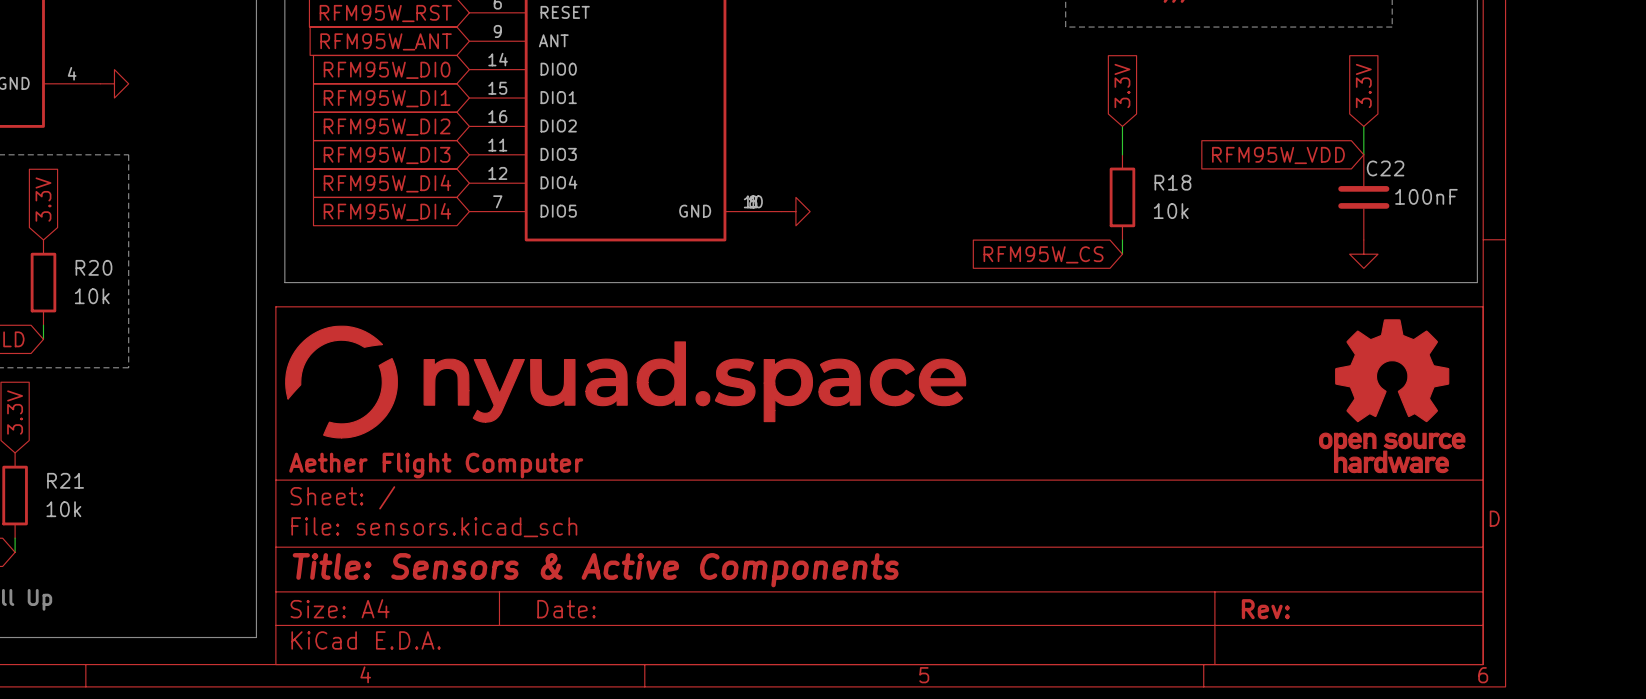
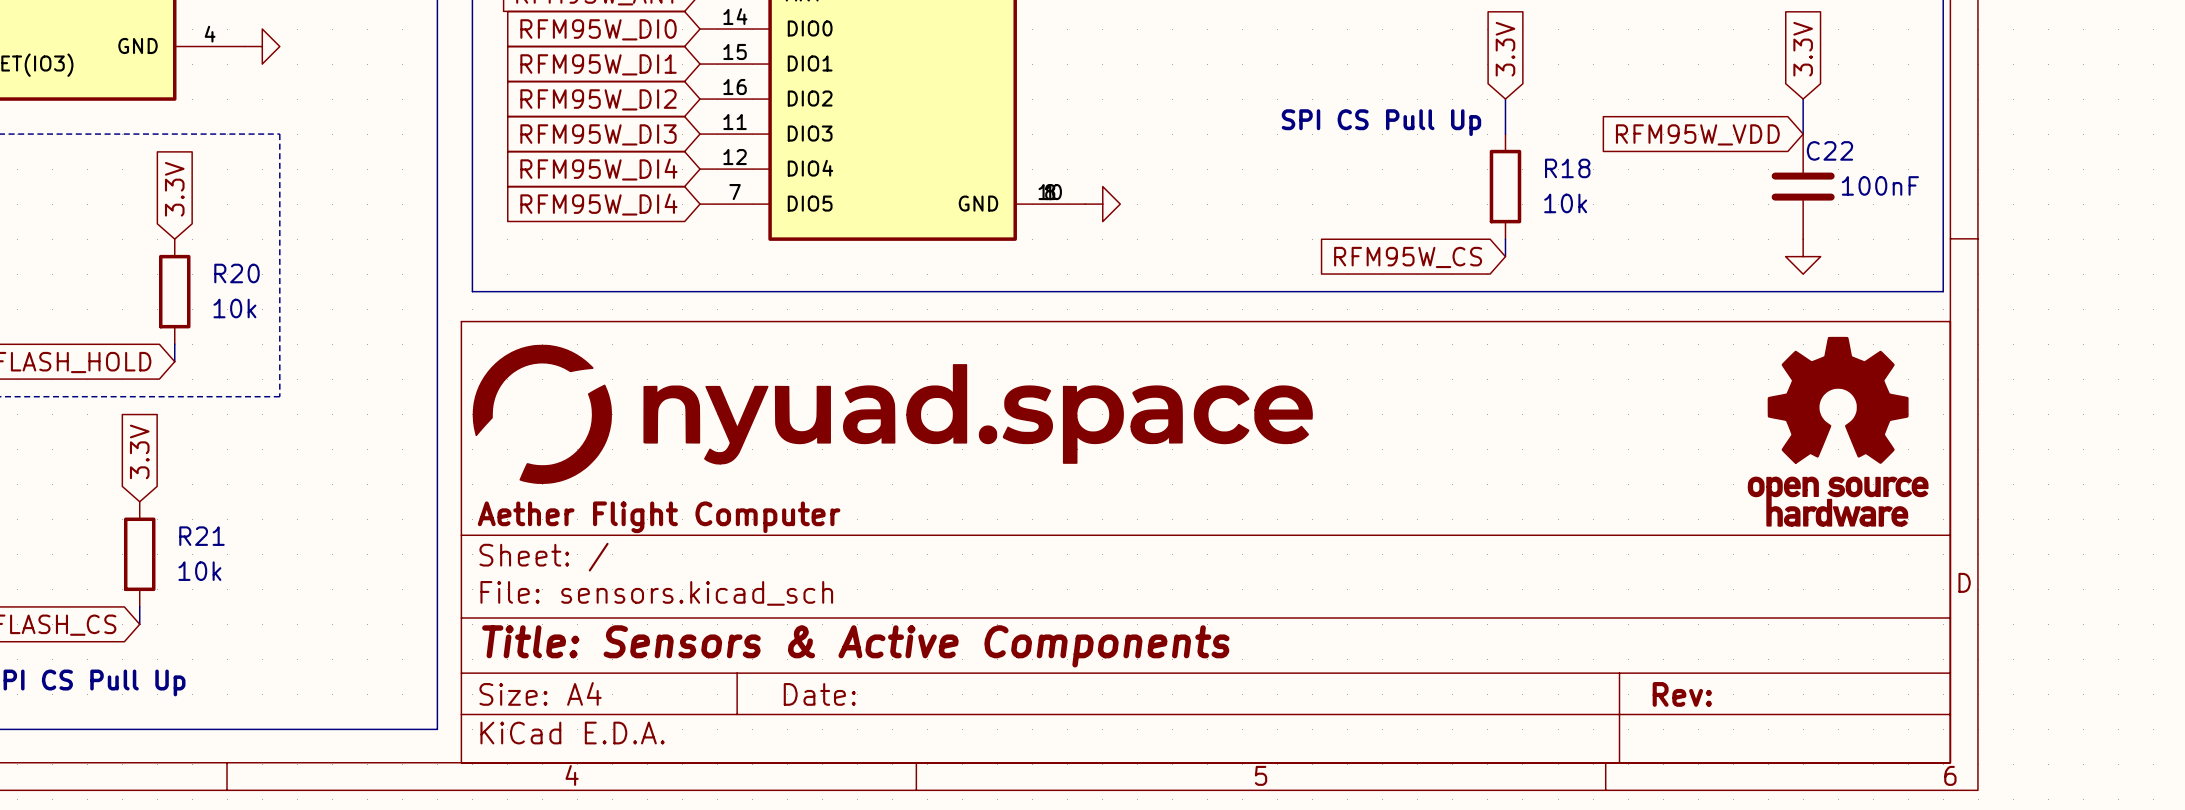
text: none -> SPI CS Pull Up (1381, 122)

